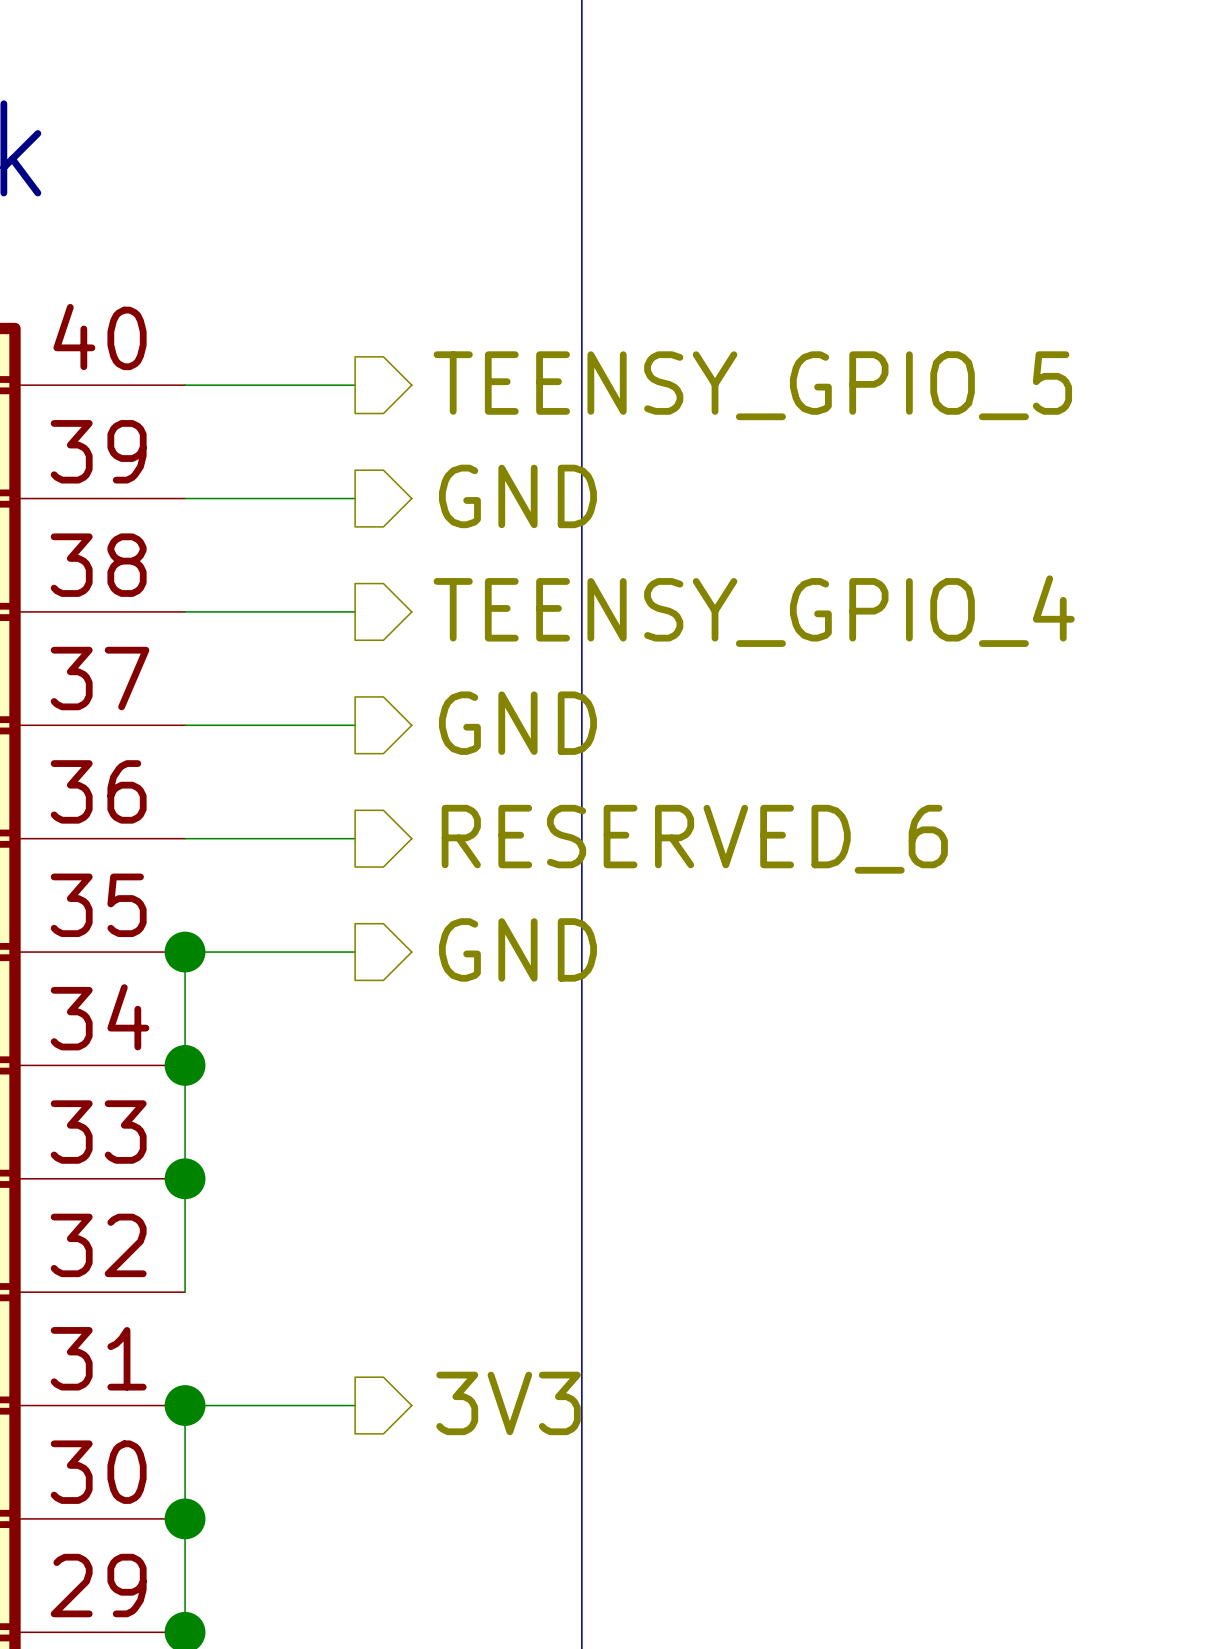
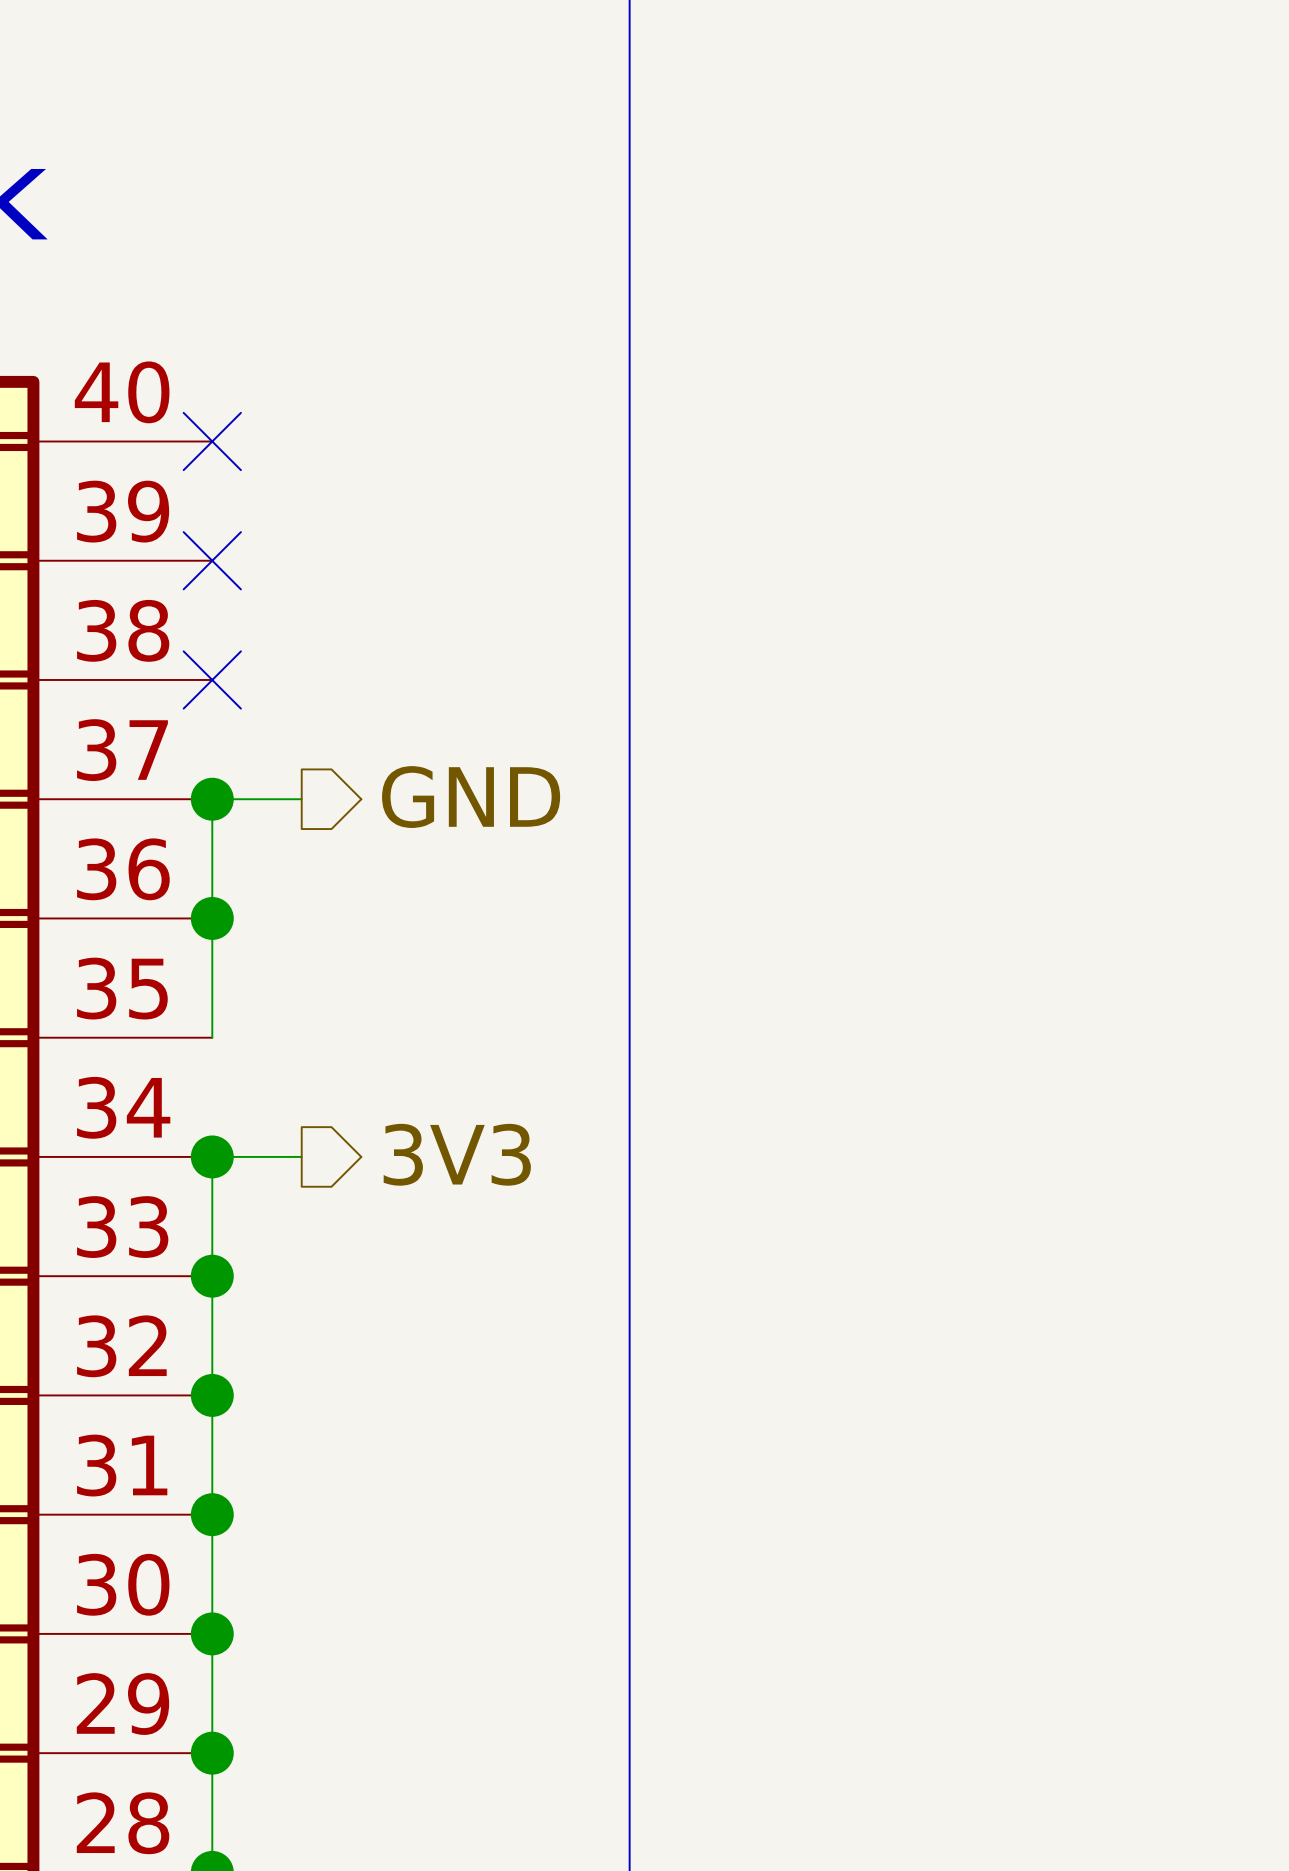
wire: (185, 385) (355, 385) -> none
no-connect mark: none -> (212, 441)
hierarchical label: TEENSY_GPIO_5 (752, 385) -> none
hierarchical label: GND (517, 496) -> none
wire: (185, 498) (355, 498) -> none
no-connect mark: none -> (212, 560)
wire: (185, 611) (355, 611) -> none
no-connect mark: none -> (212, 679)
hierarchical label: TEENSY_GPIO_4 (754, 611) -> none
hierarchical label position: GND (517, 723) -> GND (471, 797)
wire: none -> (212, 799) (212, 1037)
junction: none -> (212, 799)
wire: (270, 725) (355, 725) -> none
wire: (185, 838) (355, 838) -> none
junction: none -> (212, 918)
hierarchical label: RESERVED_6 (694, 839) -> none
hierarchical label: GND (517, 949) -> none
junction: (185, 952) -> none
wire: (355, 952) (185, 952) (185, 1065) -> (301, 1156) (212, 1156)
junction: none -> (212, 1395)
hierarchical label position: 3V3 (508, 1403) -> 3V3 (457, 1154)
wire: (185, 1405) (355, 1405) -> (212, 1514) (212, 1395)

